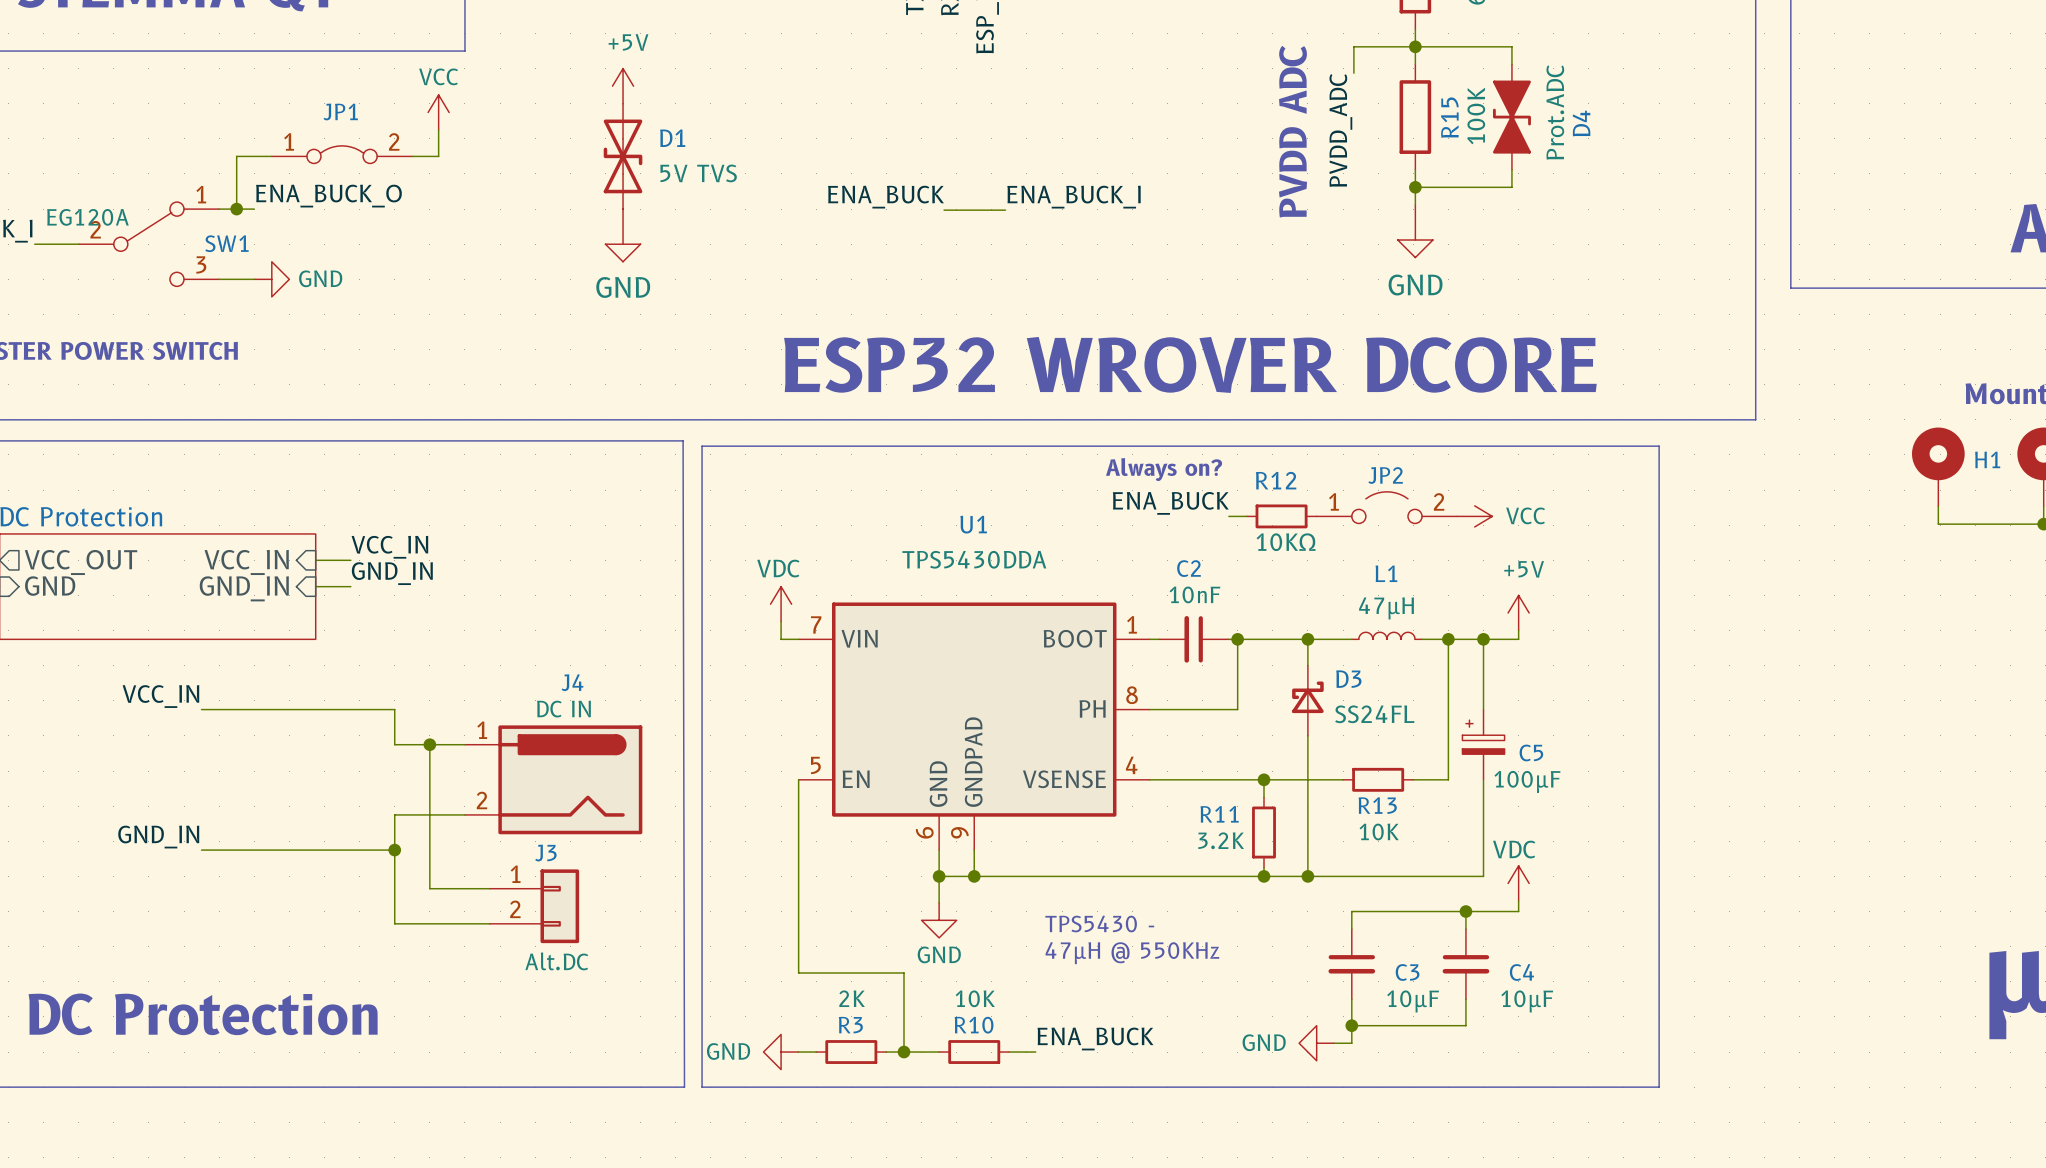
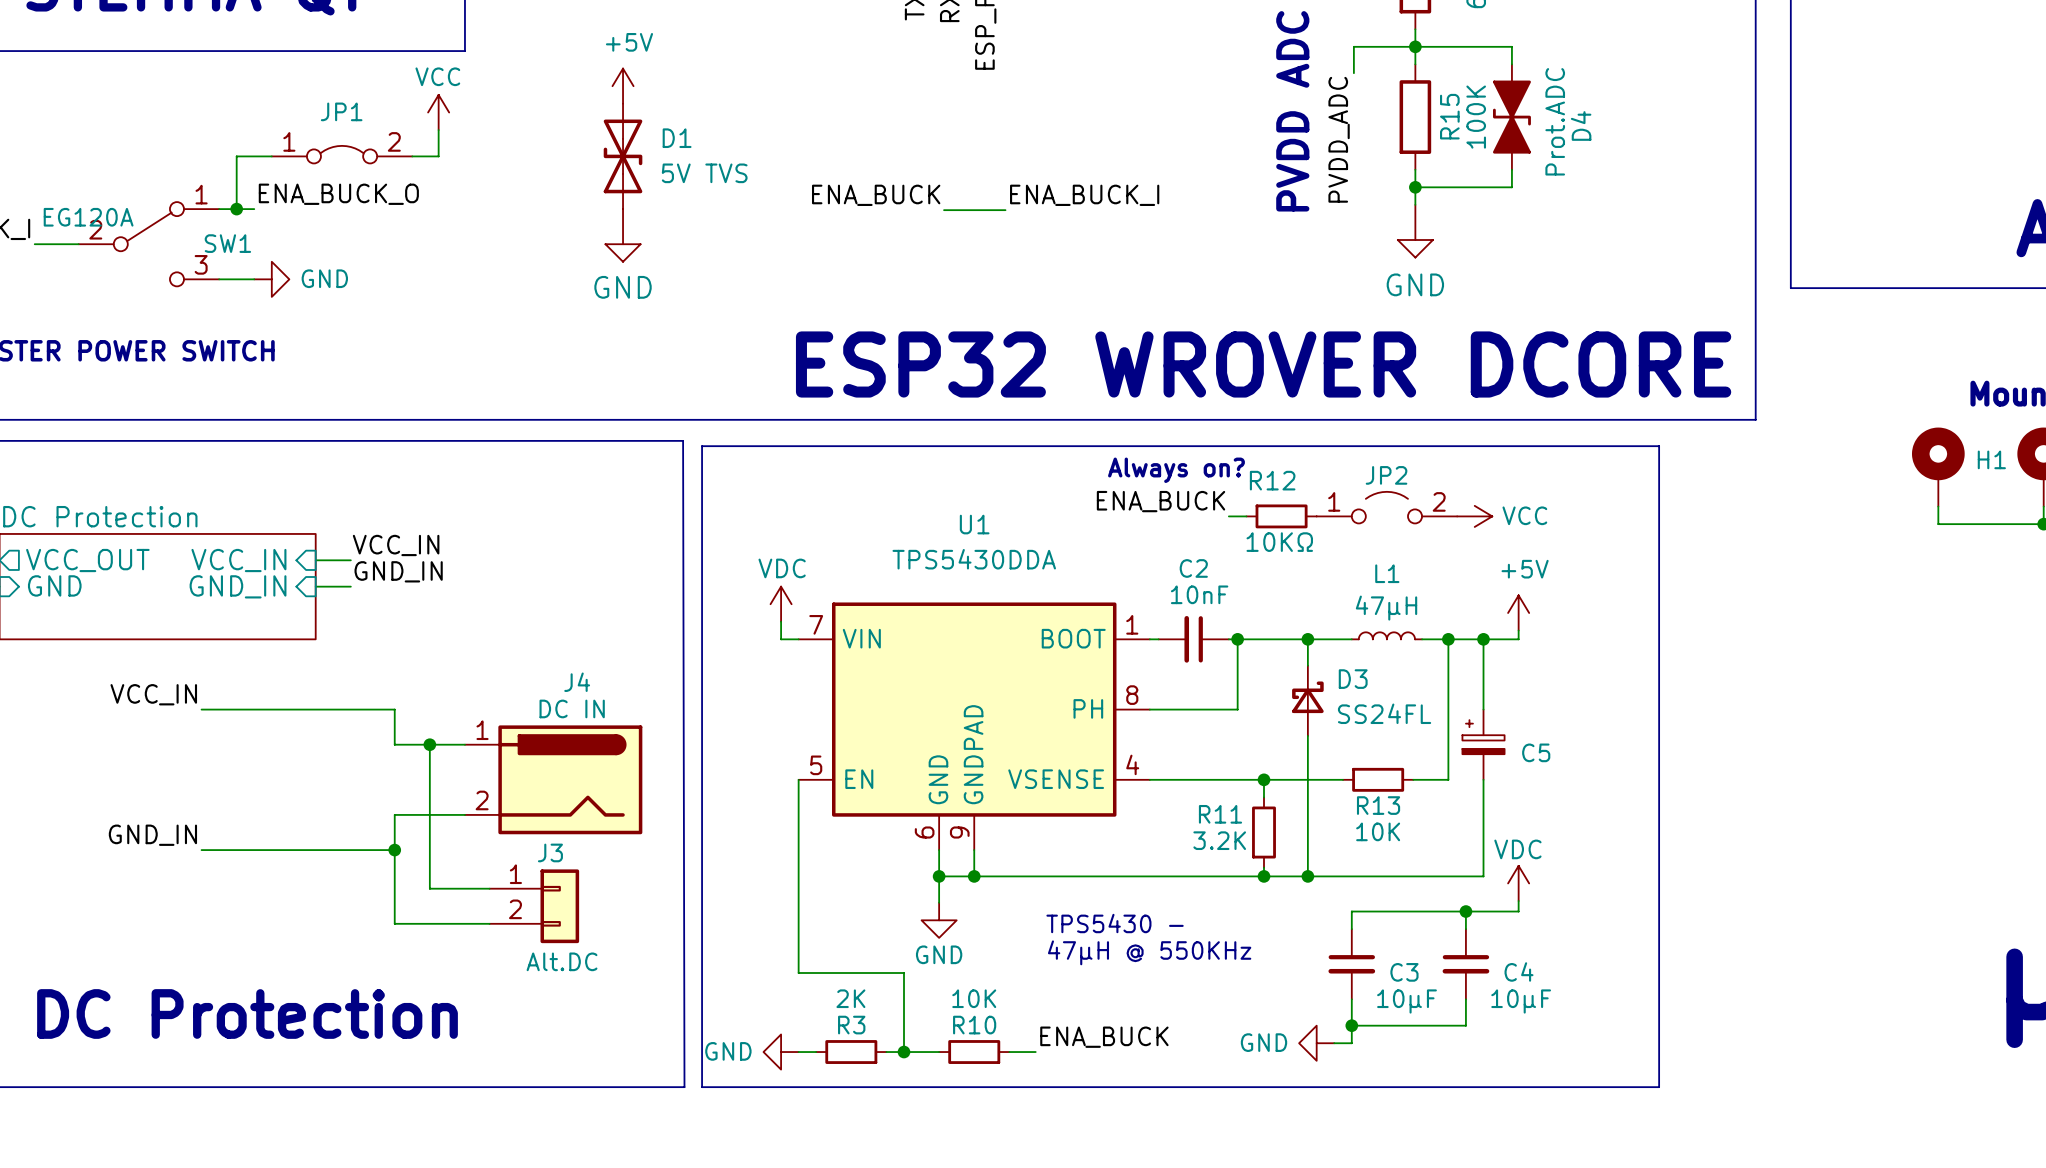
C5 value: 100µF (1527, 781) -> none

